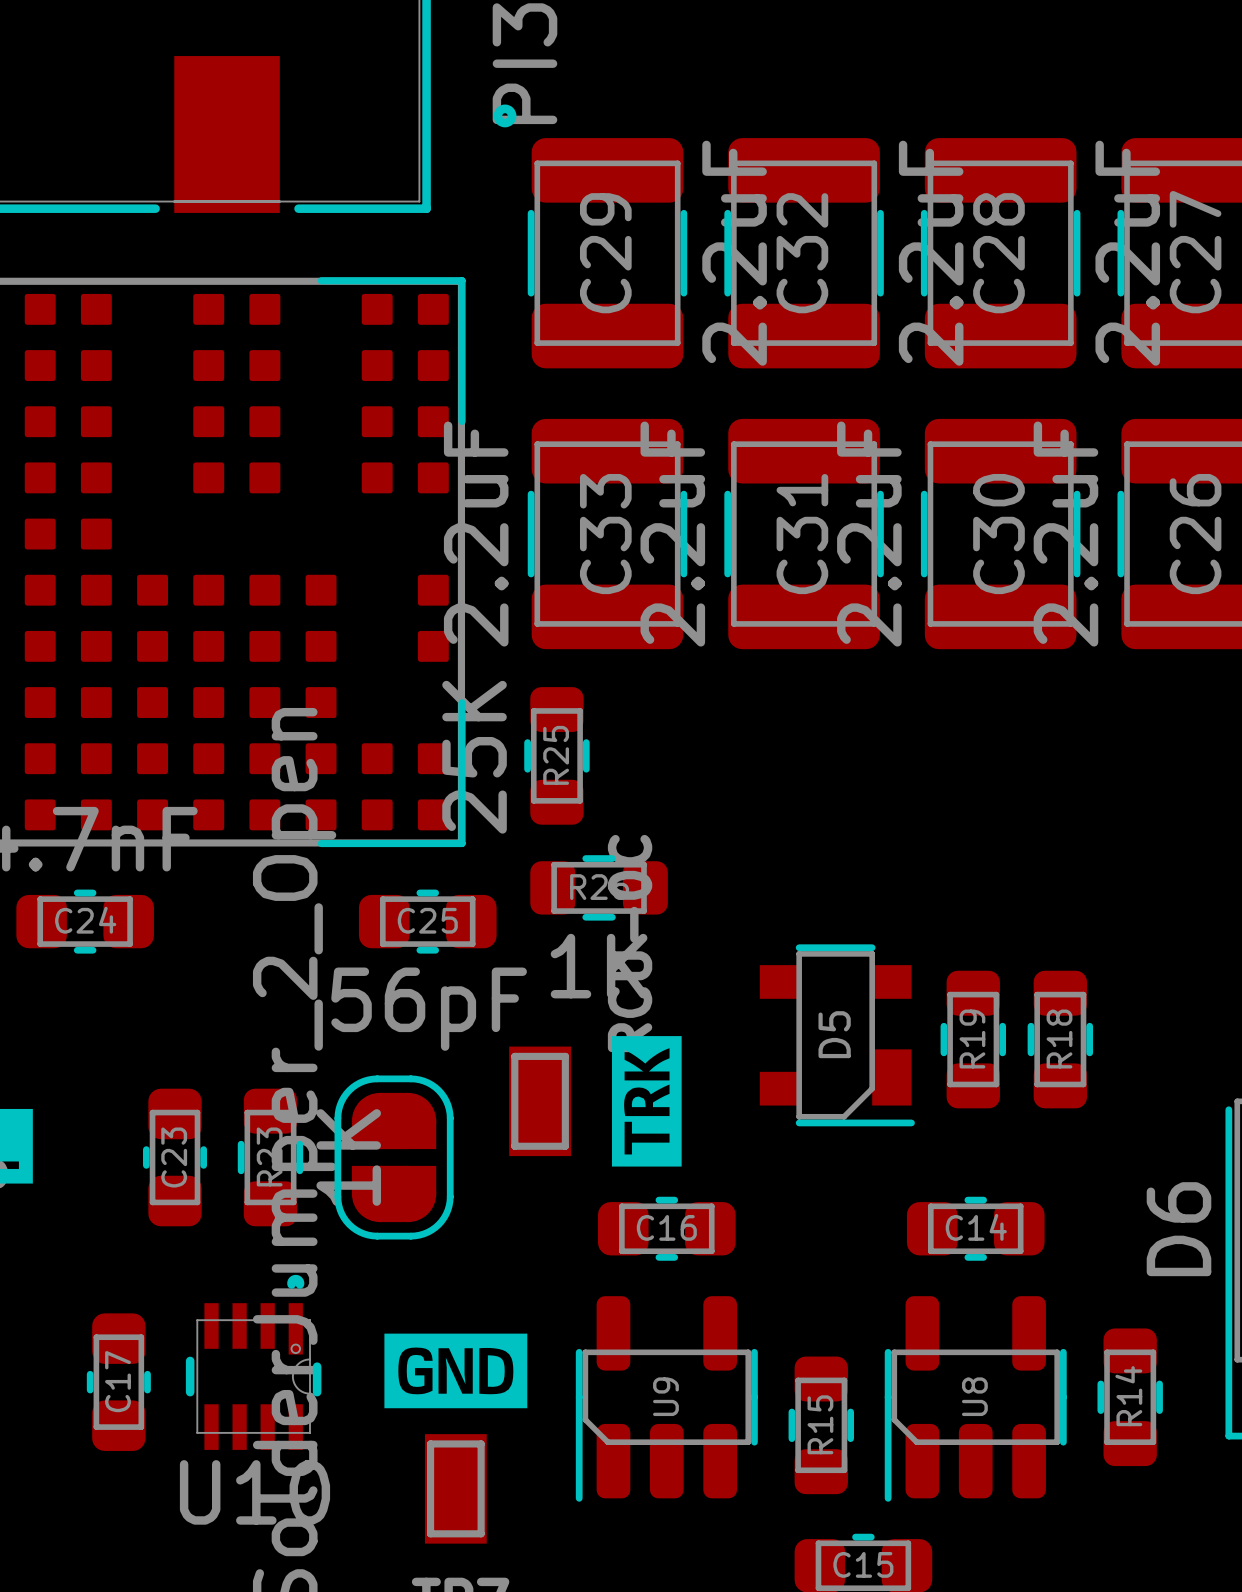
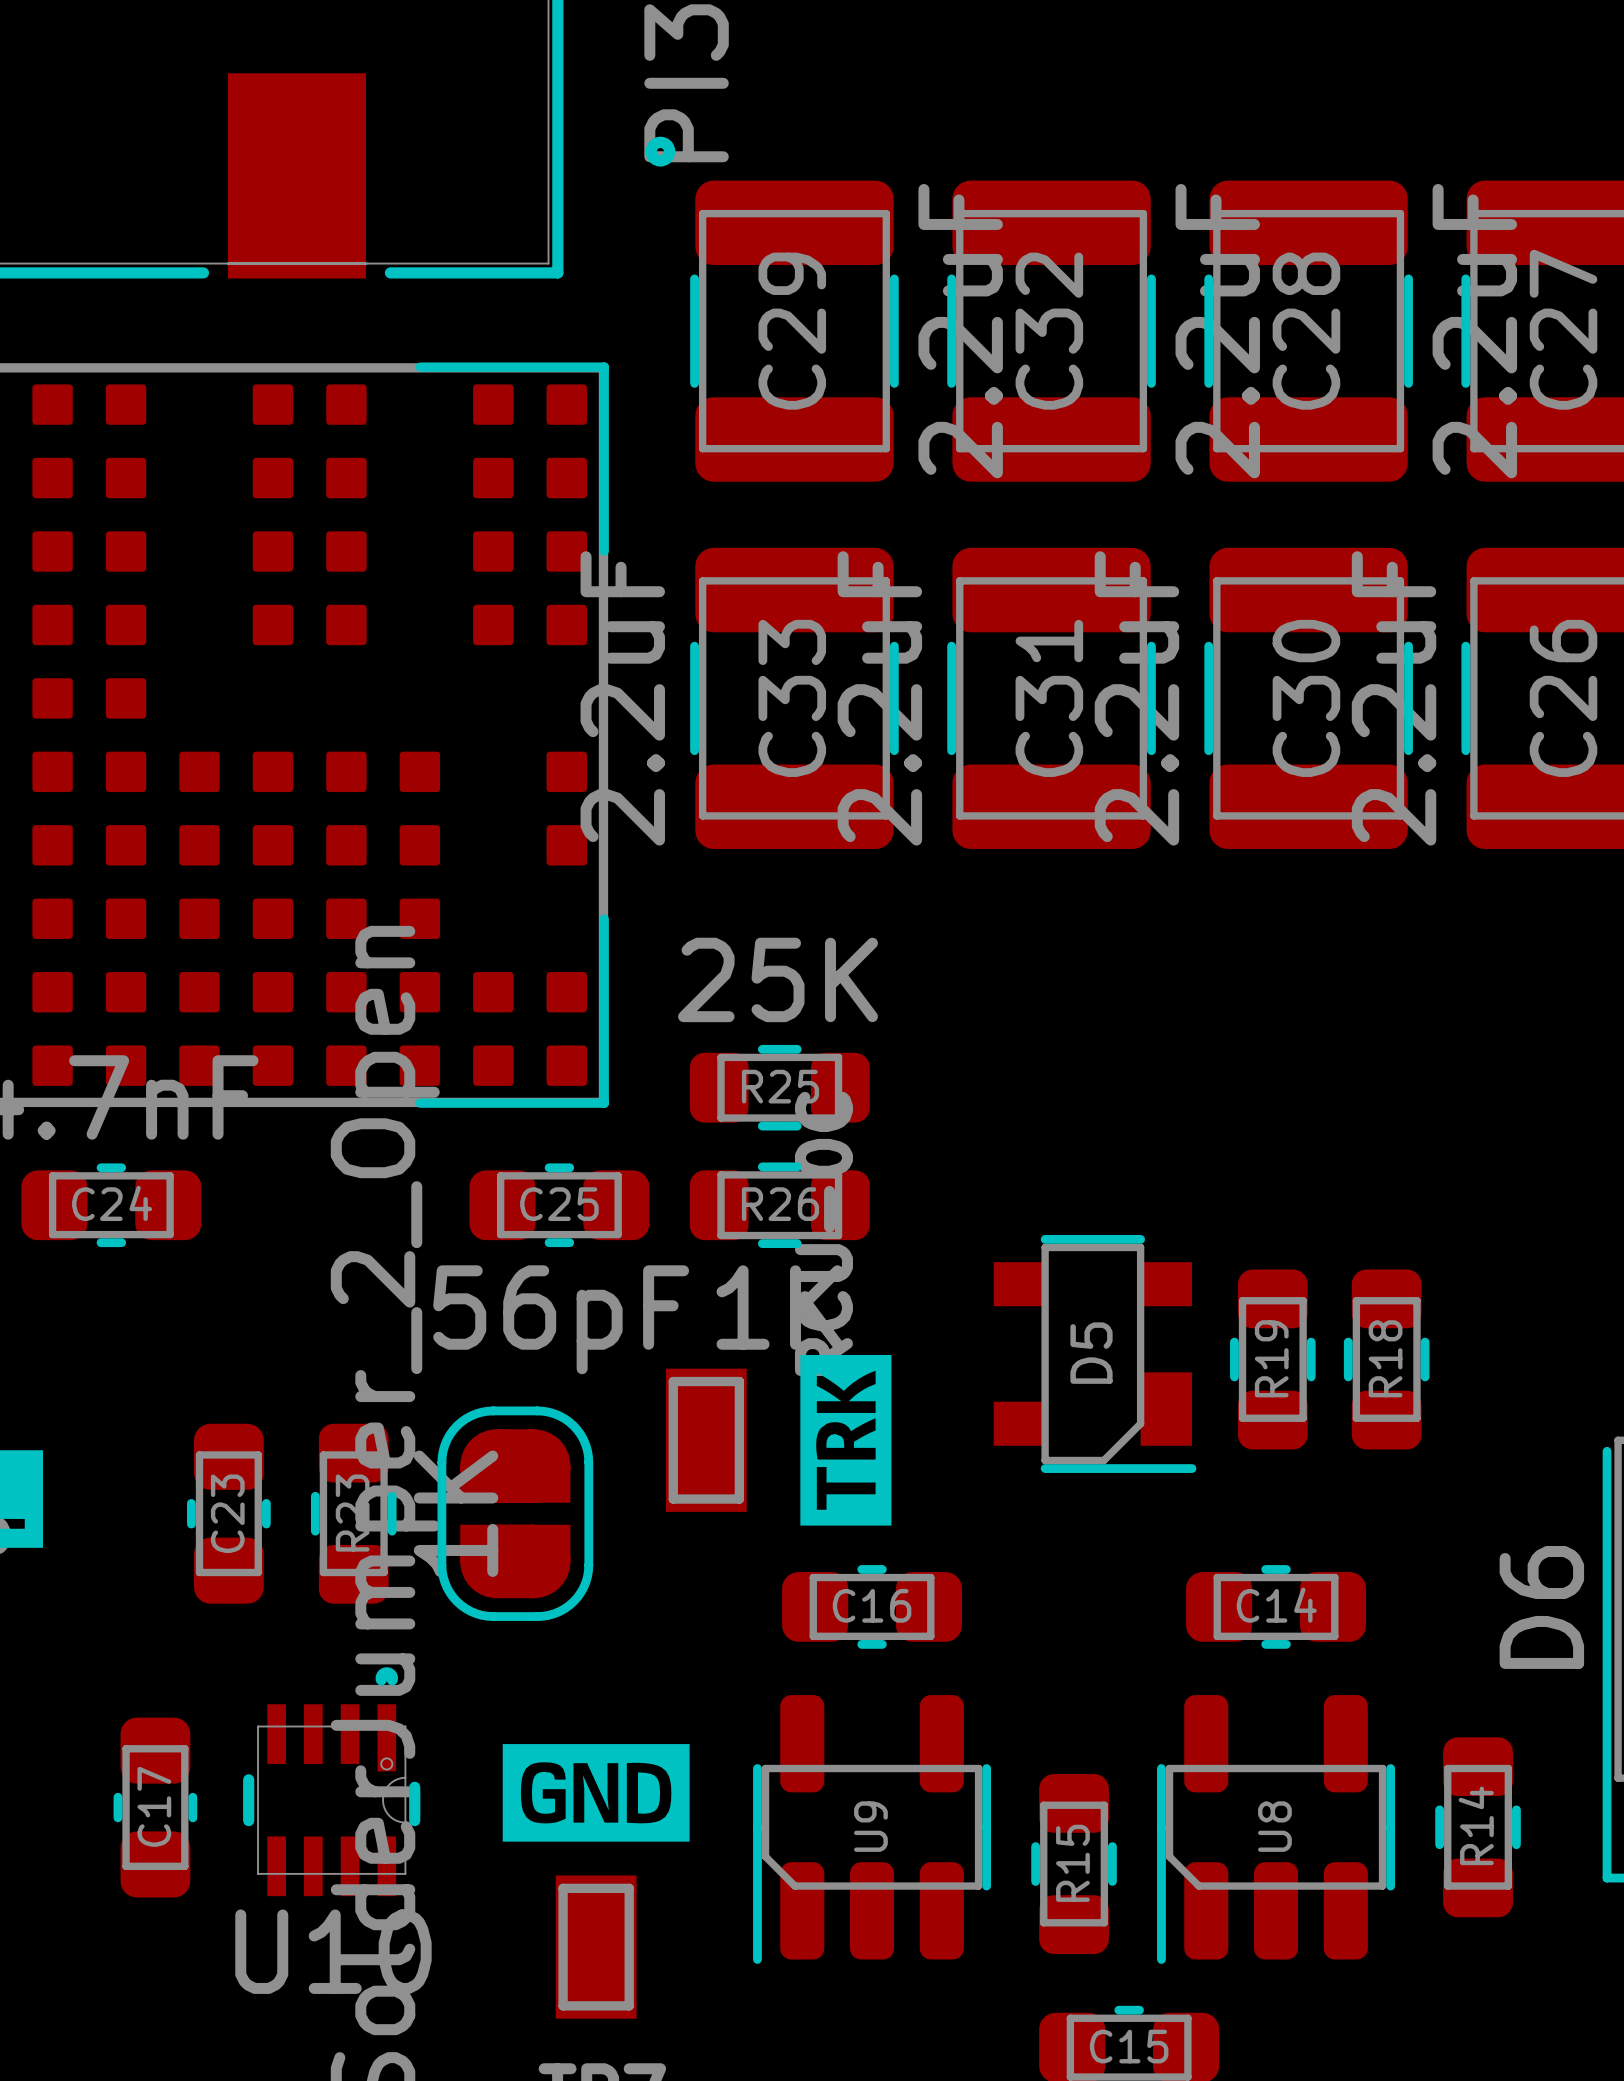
R25 rotation: 0° (556, 755) -> 90° clockwise (779, 1087)
R25 position: (556, 755) -> (779, 1087)
R26 position: (599, 887) -> (779, 1205)

